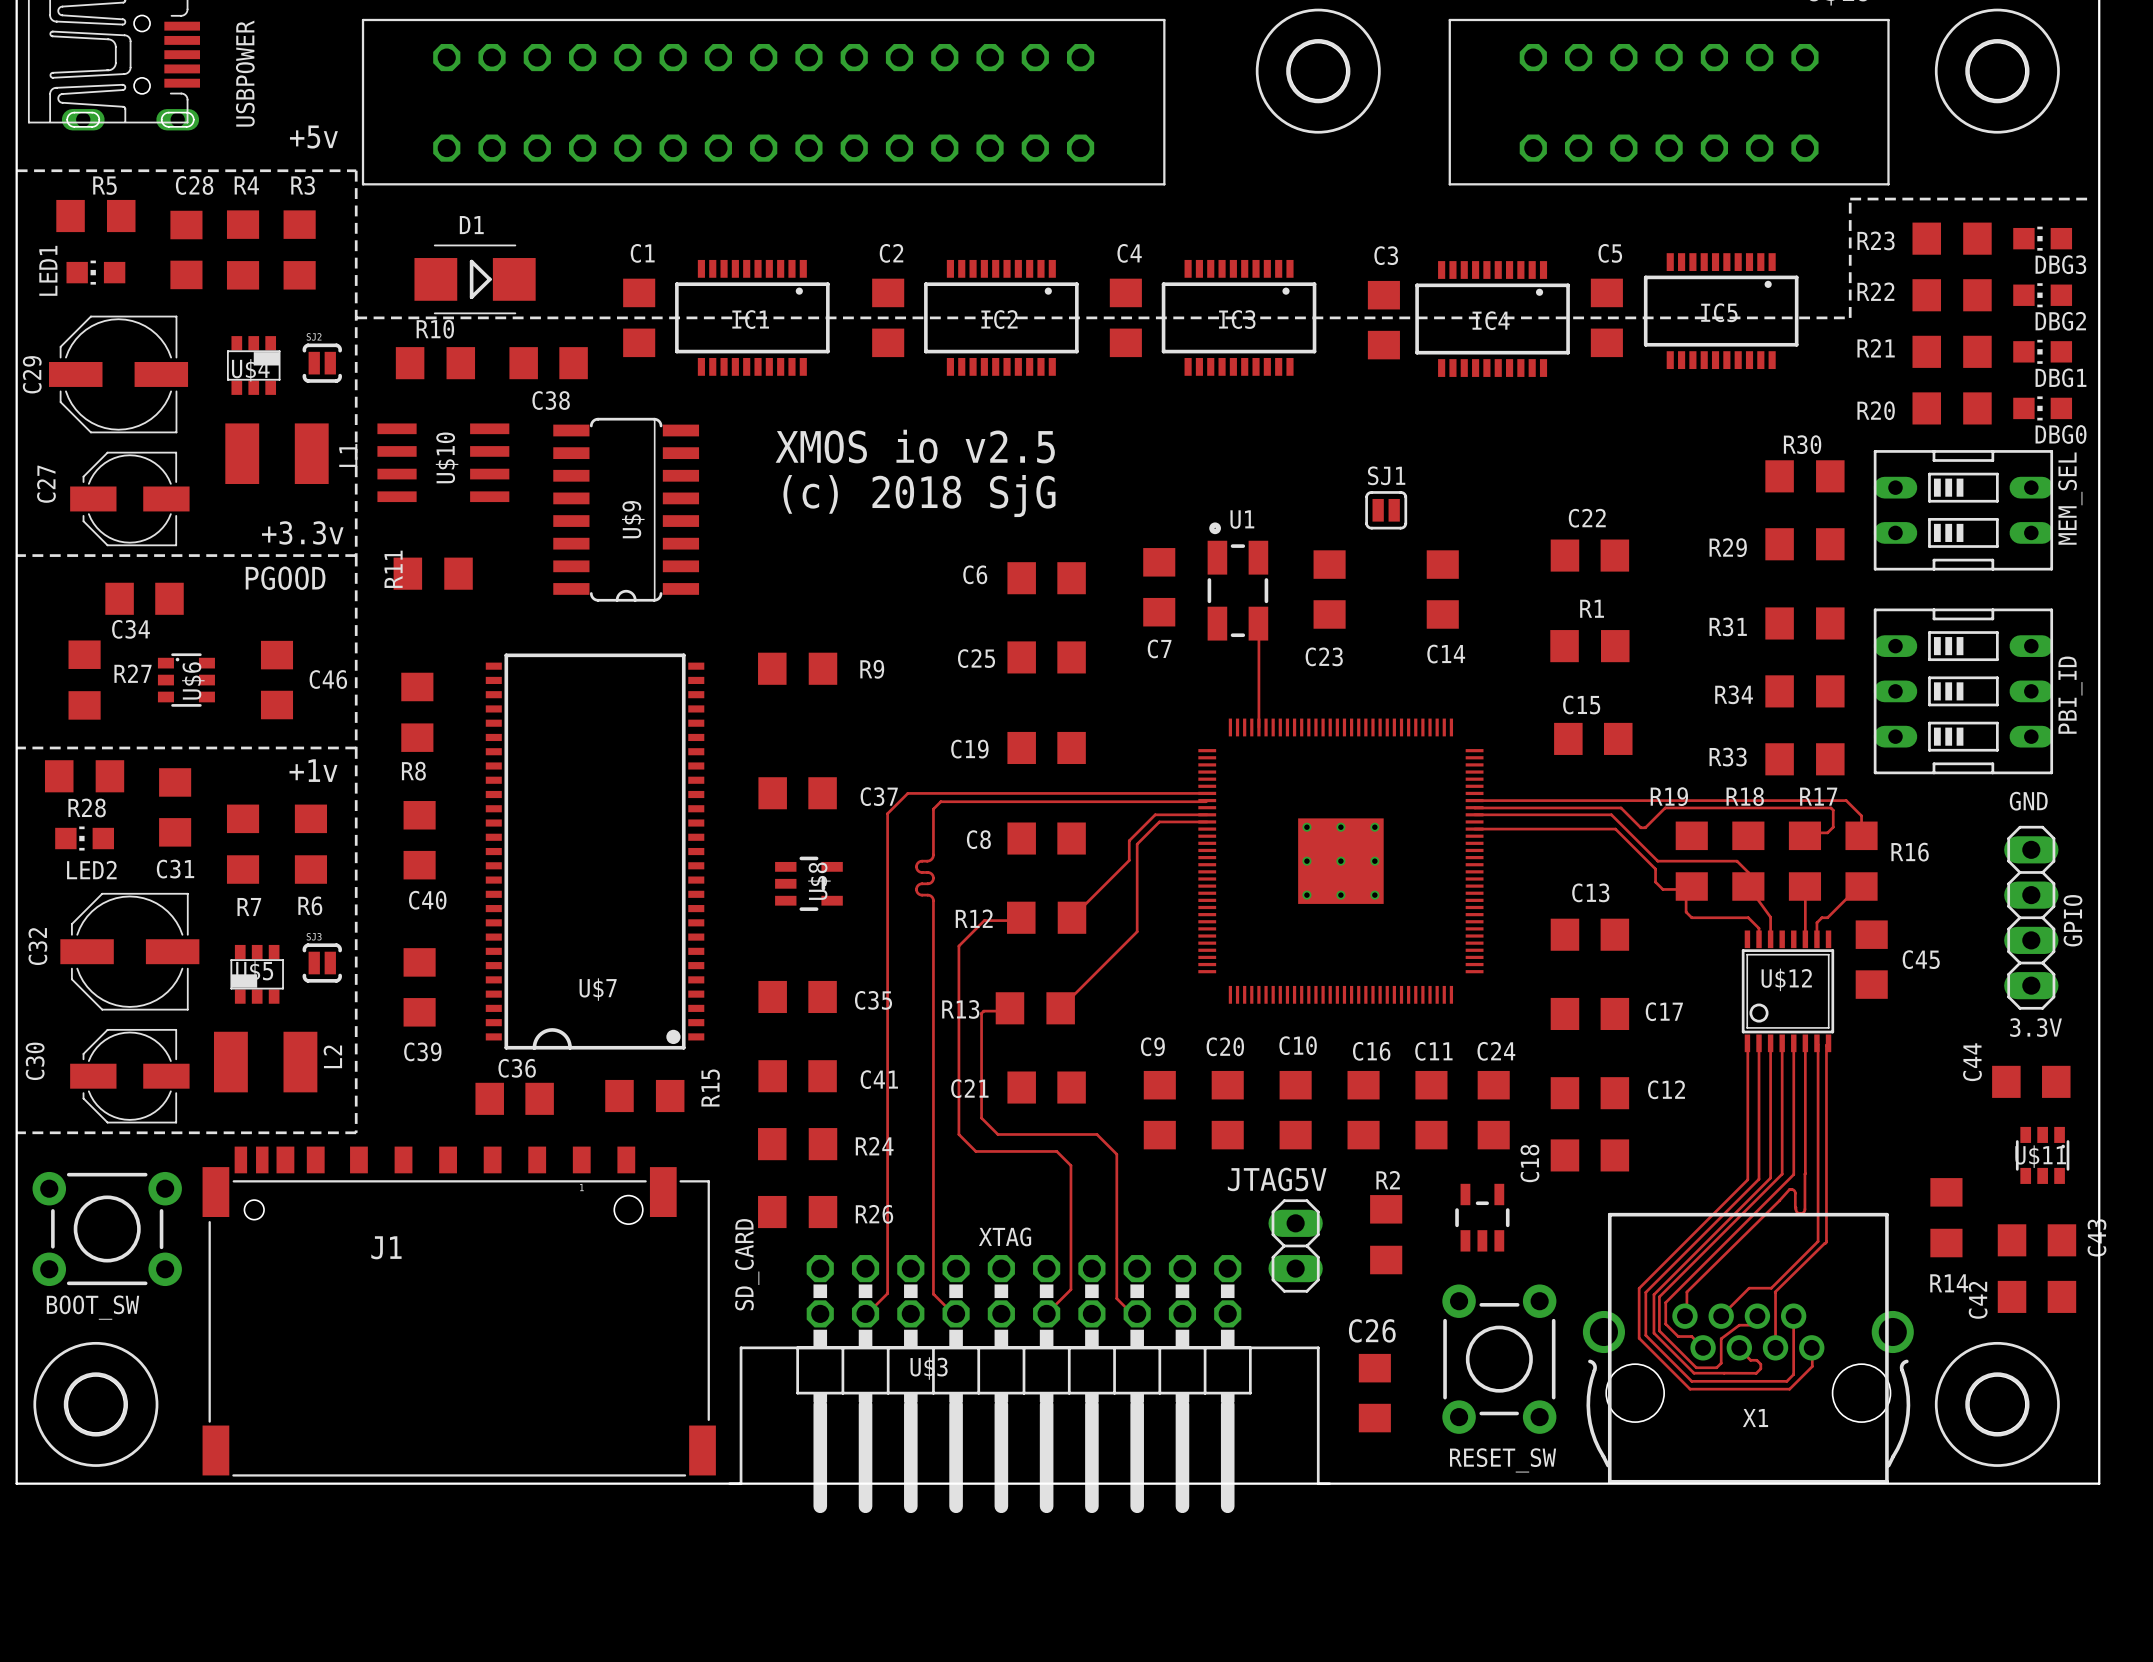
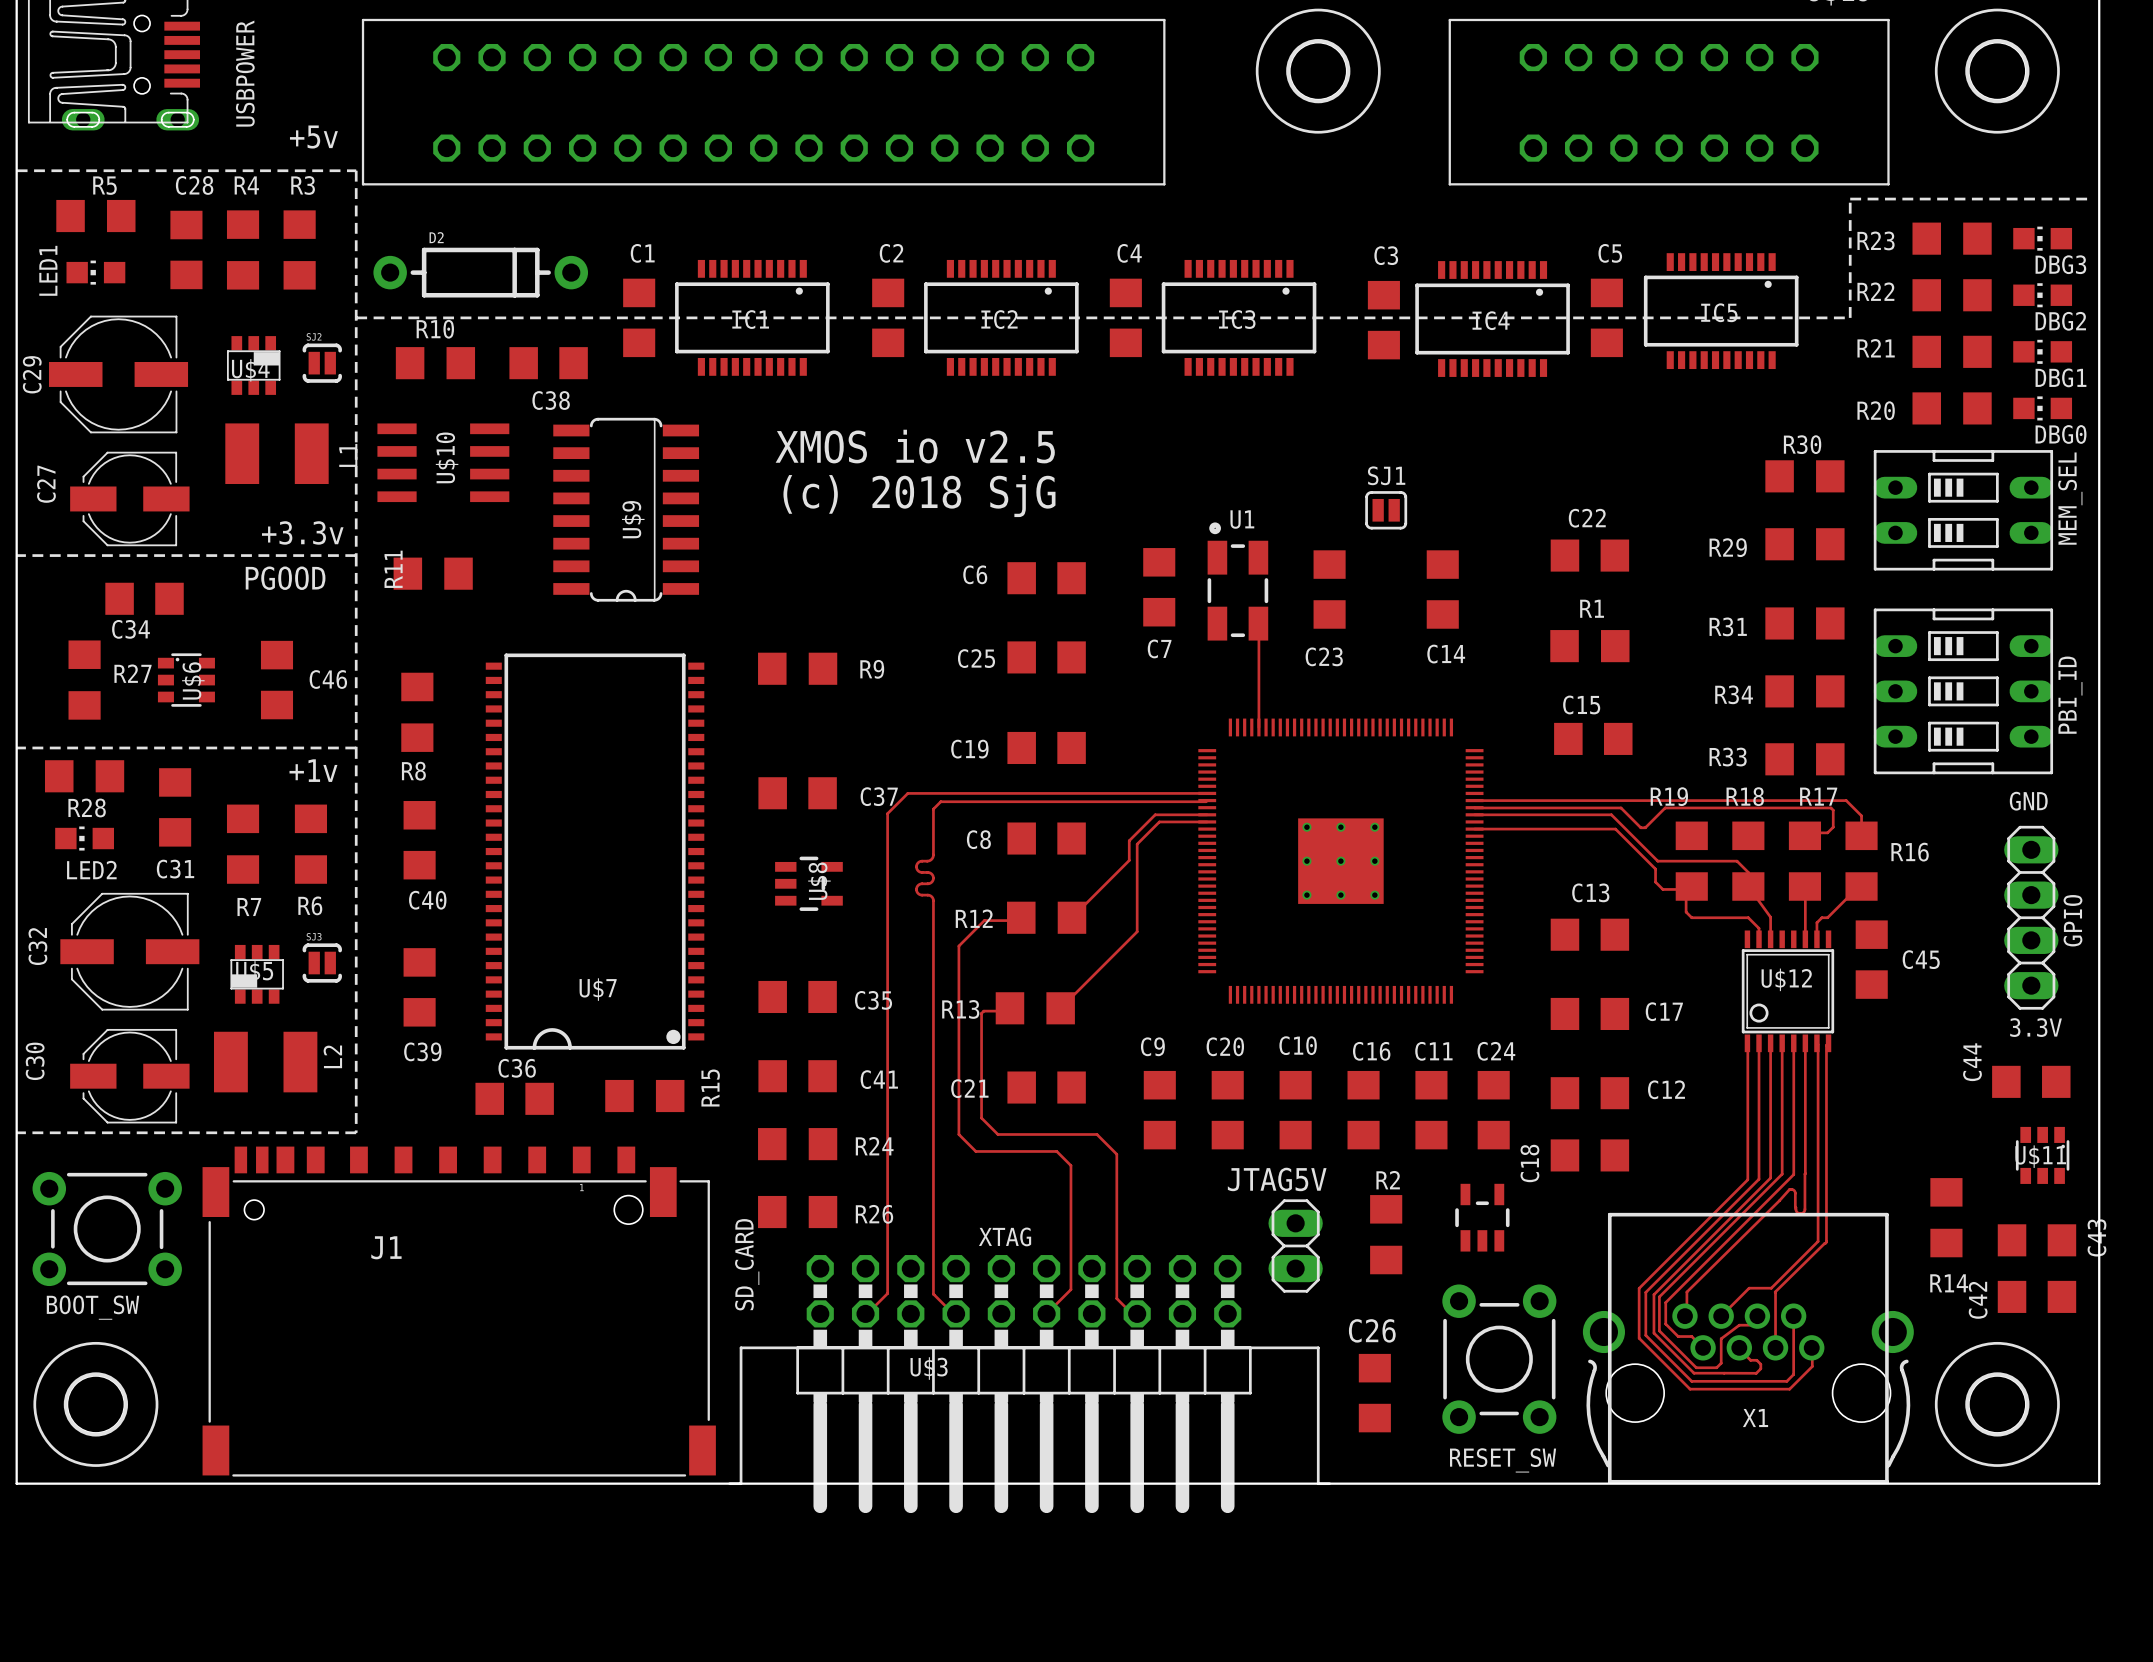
D2: none -> (480, 272)
D1: (475, 279) -> none

